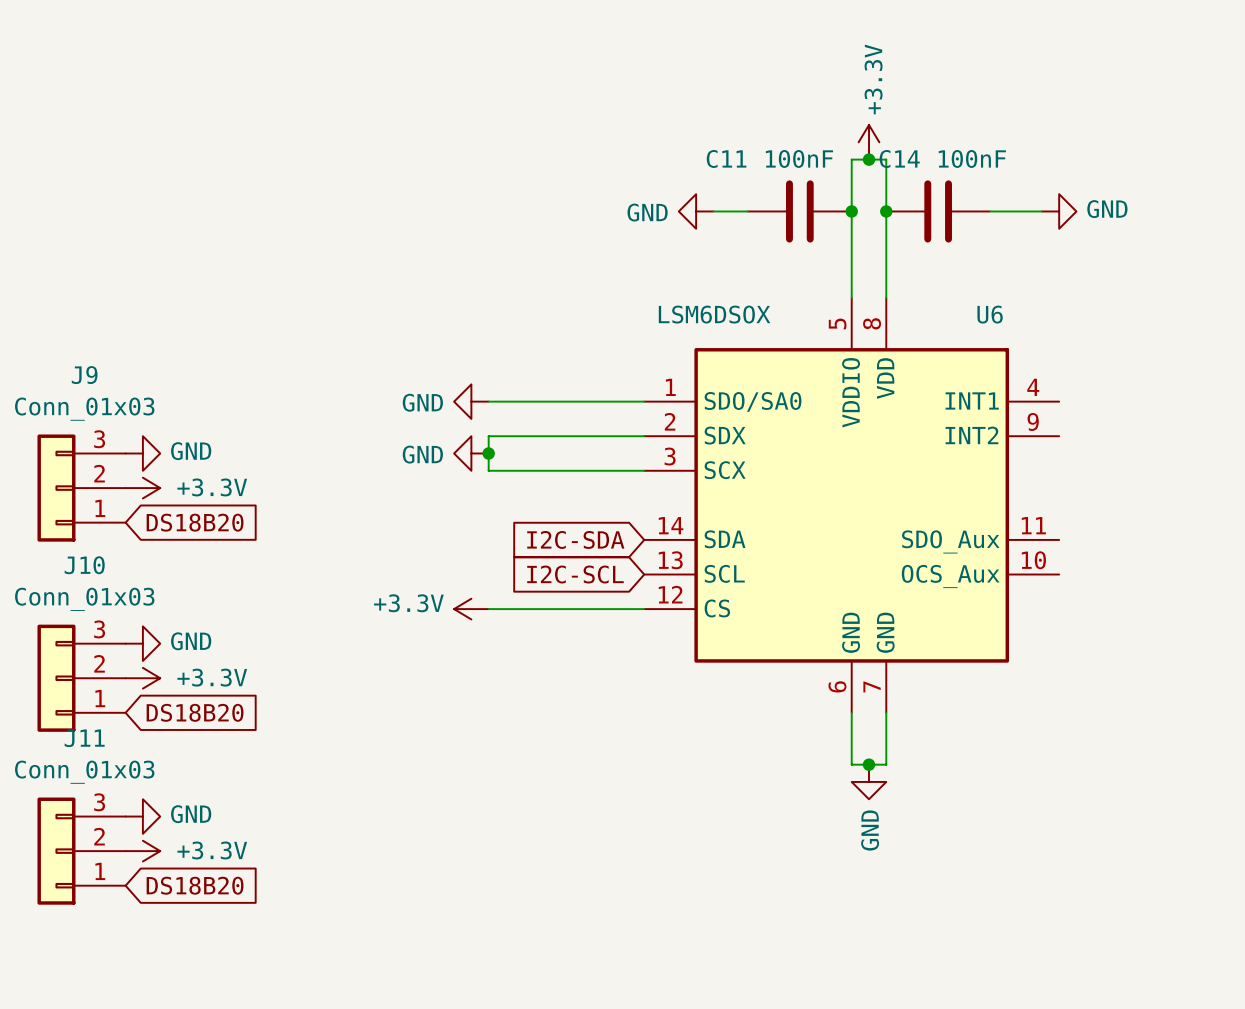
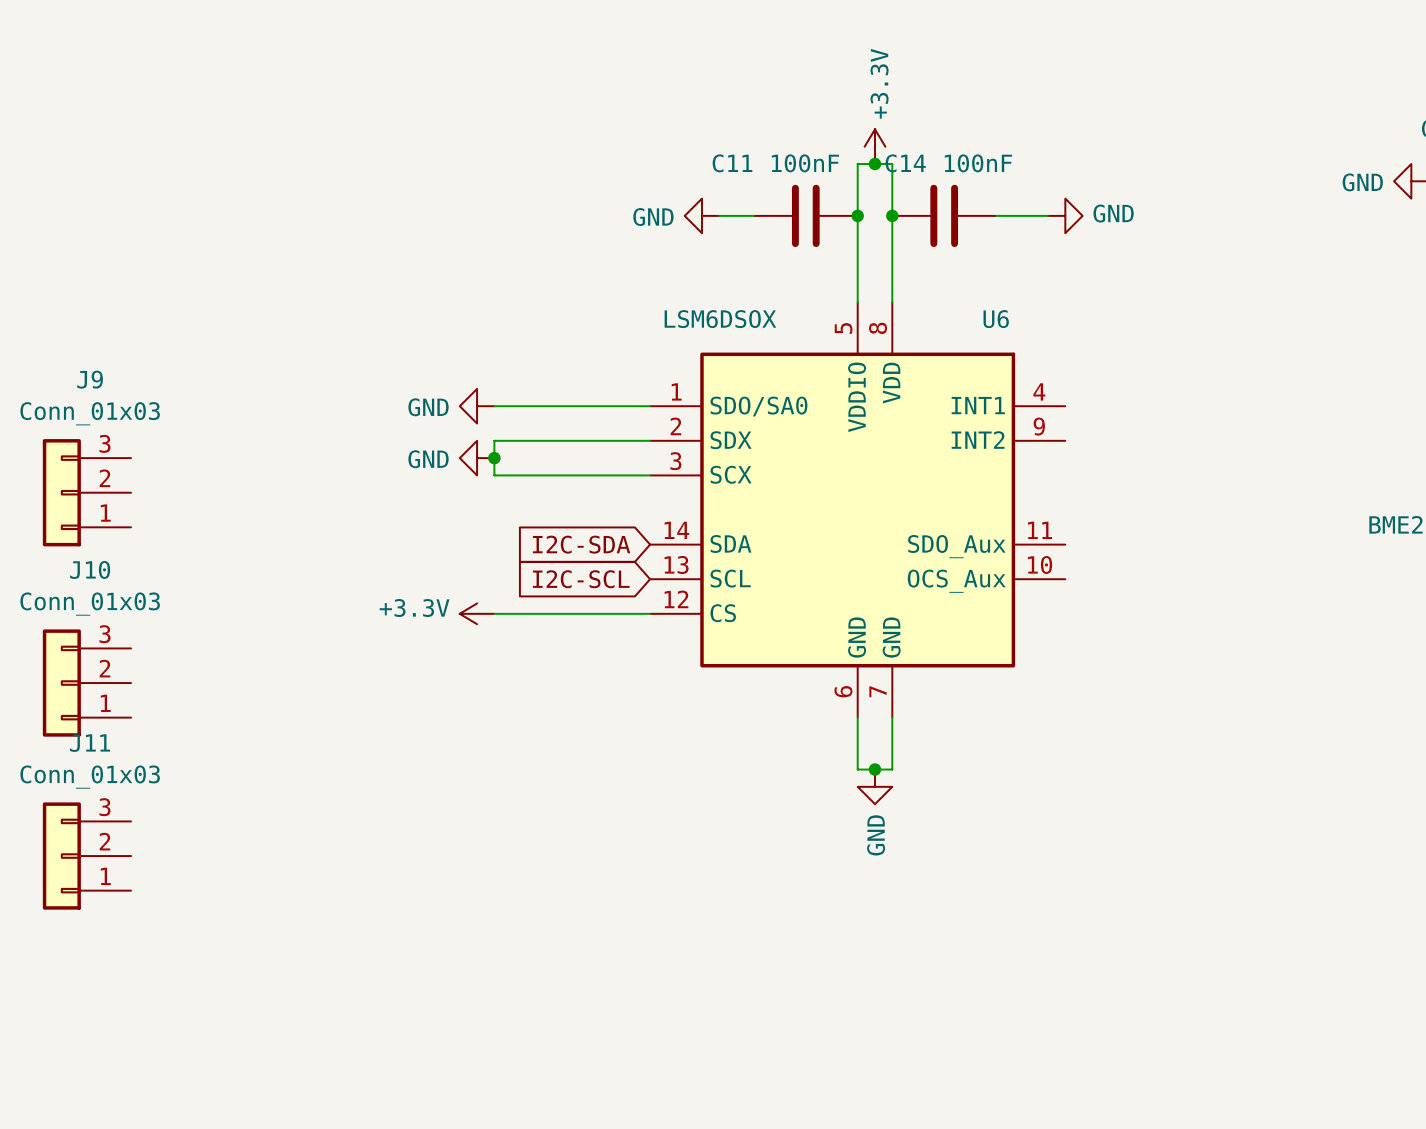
power symbol: GND (142, 453) -> none
power symbol: +3.3V (142, 488) -> none
global label: DS18B20 (195, 522) -> none
power symbol: GND (142, 643) -> none
power symbol: +3.3V (142, 678) -> none
global label: DS18B20 (195, 712) -> none
power symbol: GND (142, 816) -> none
power symbol: +3.3V (142, 851) -> none
global label: DS18B20 (195, 885) -> none

